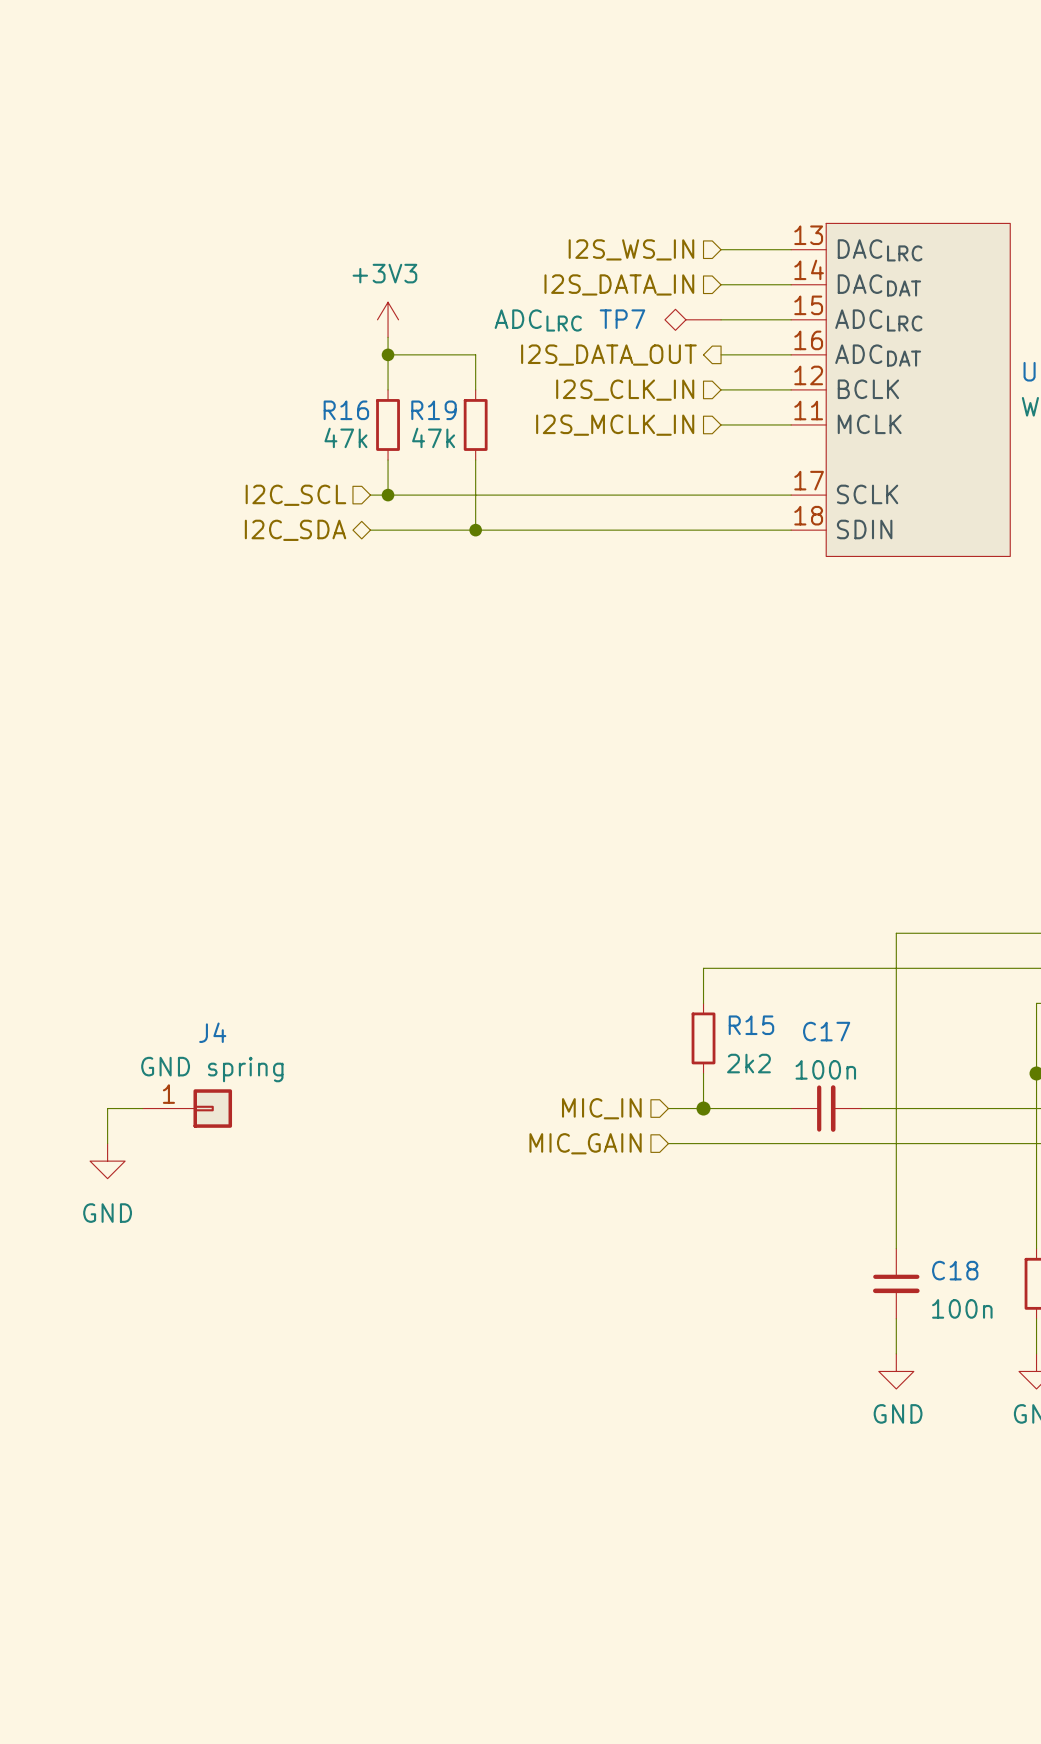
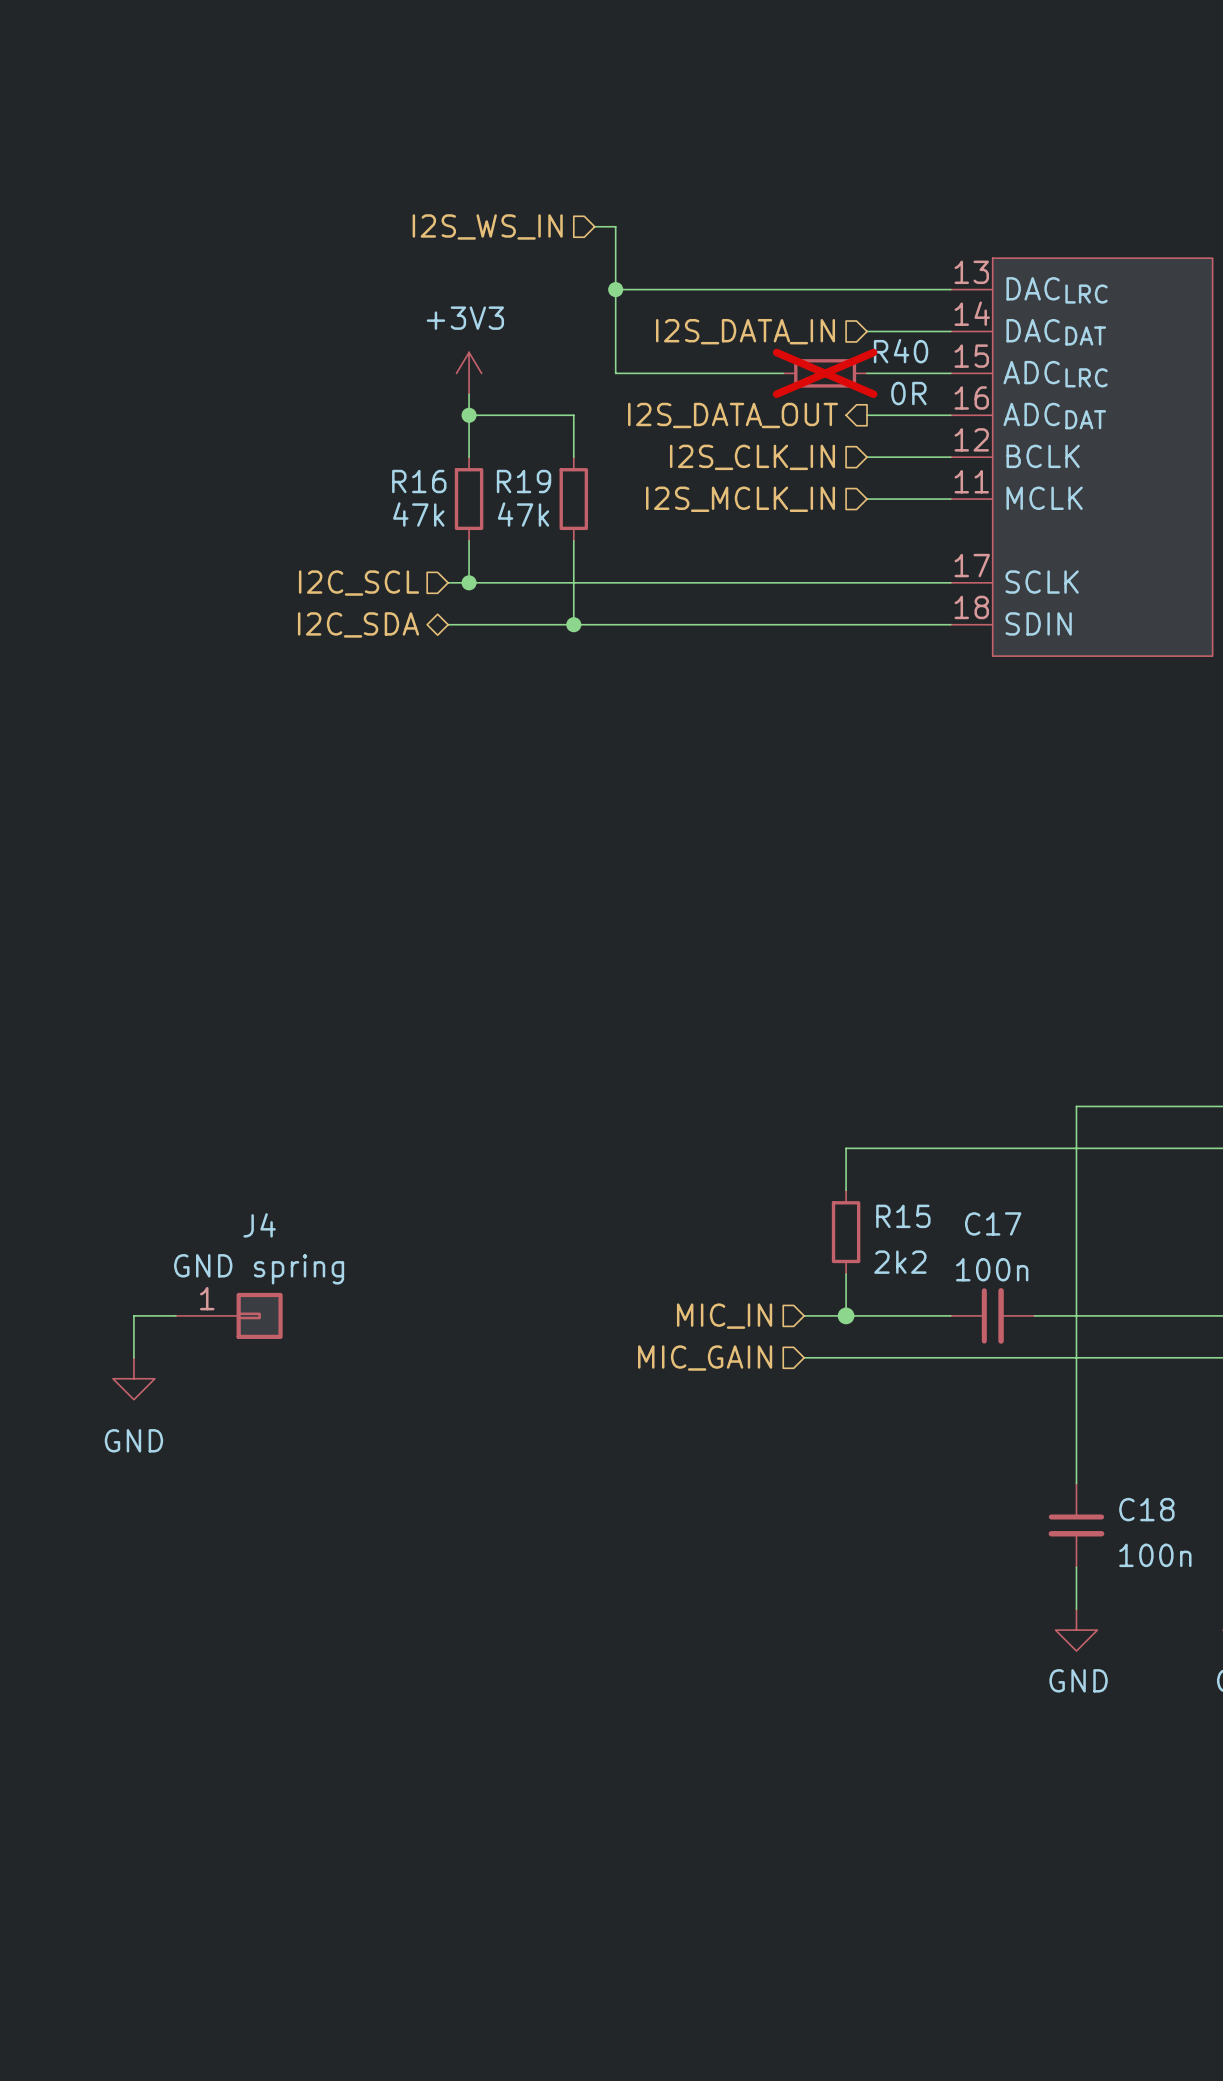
wire: none -> (594, 226) (615, 226) (615, 373) (783, 373)
wire: none -> (615, 289) (867, 289)
junction: none -> (615, 289)
hierarchical label position: I2S_WS_IN (631, 249) -> I2S_WS_IN (487, 226)
R40: none -> 0R (825, 373)
TP7: ADCLRC (693, 319) -> none

